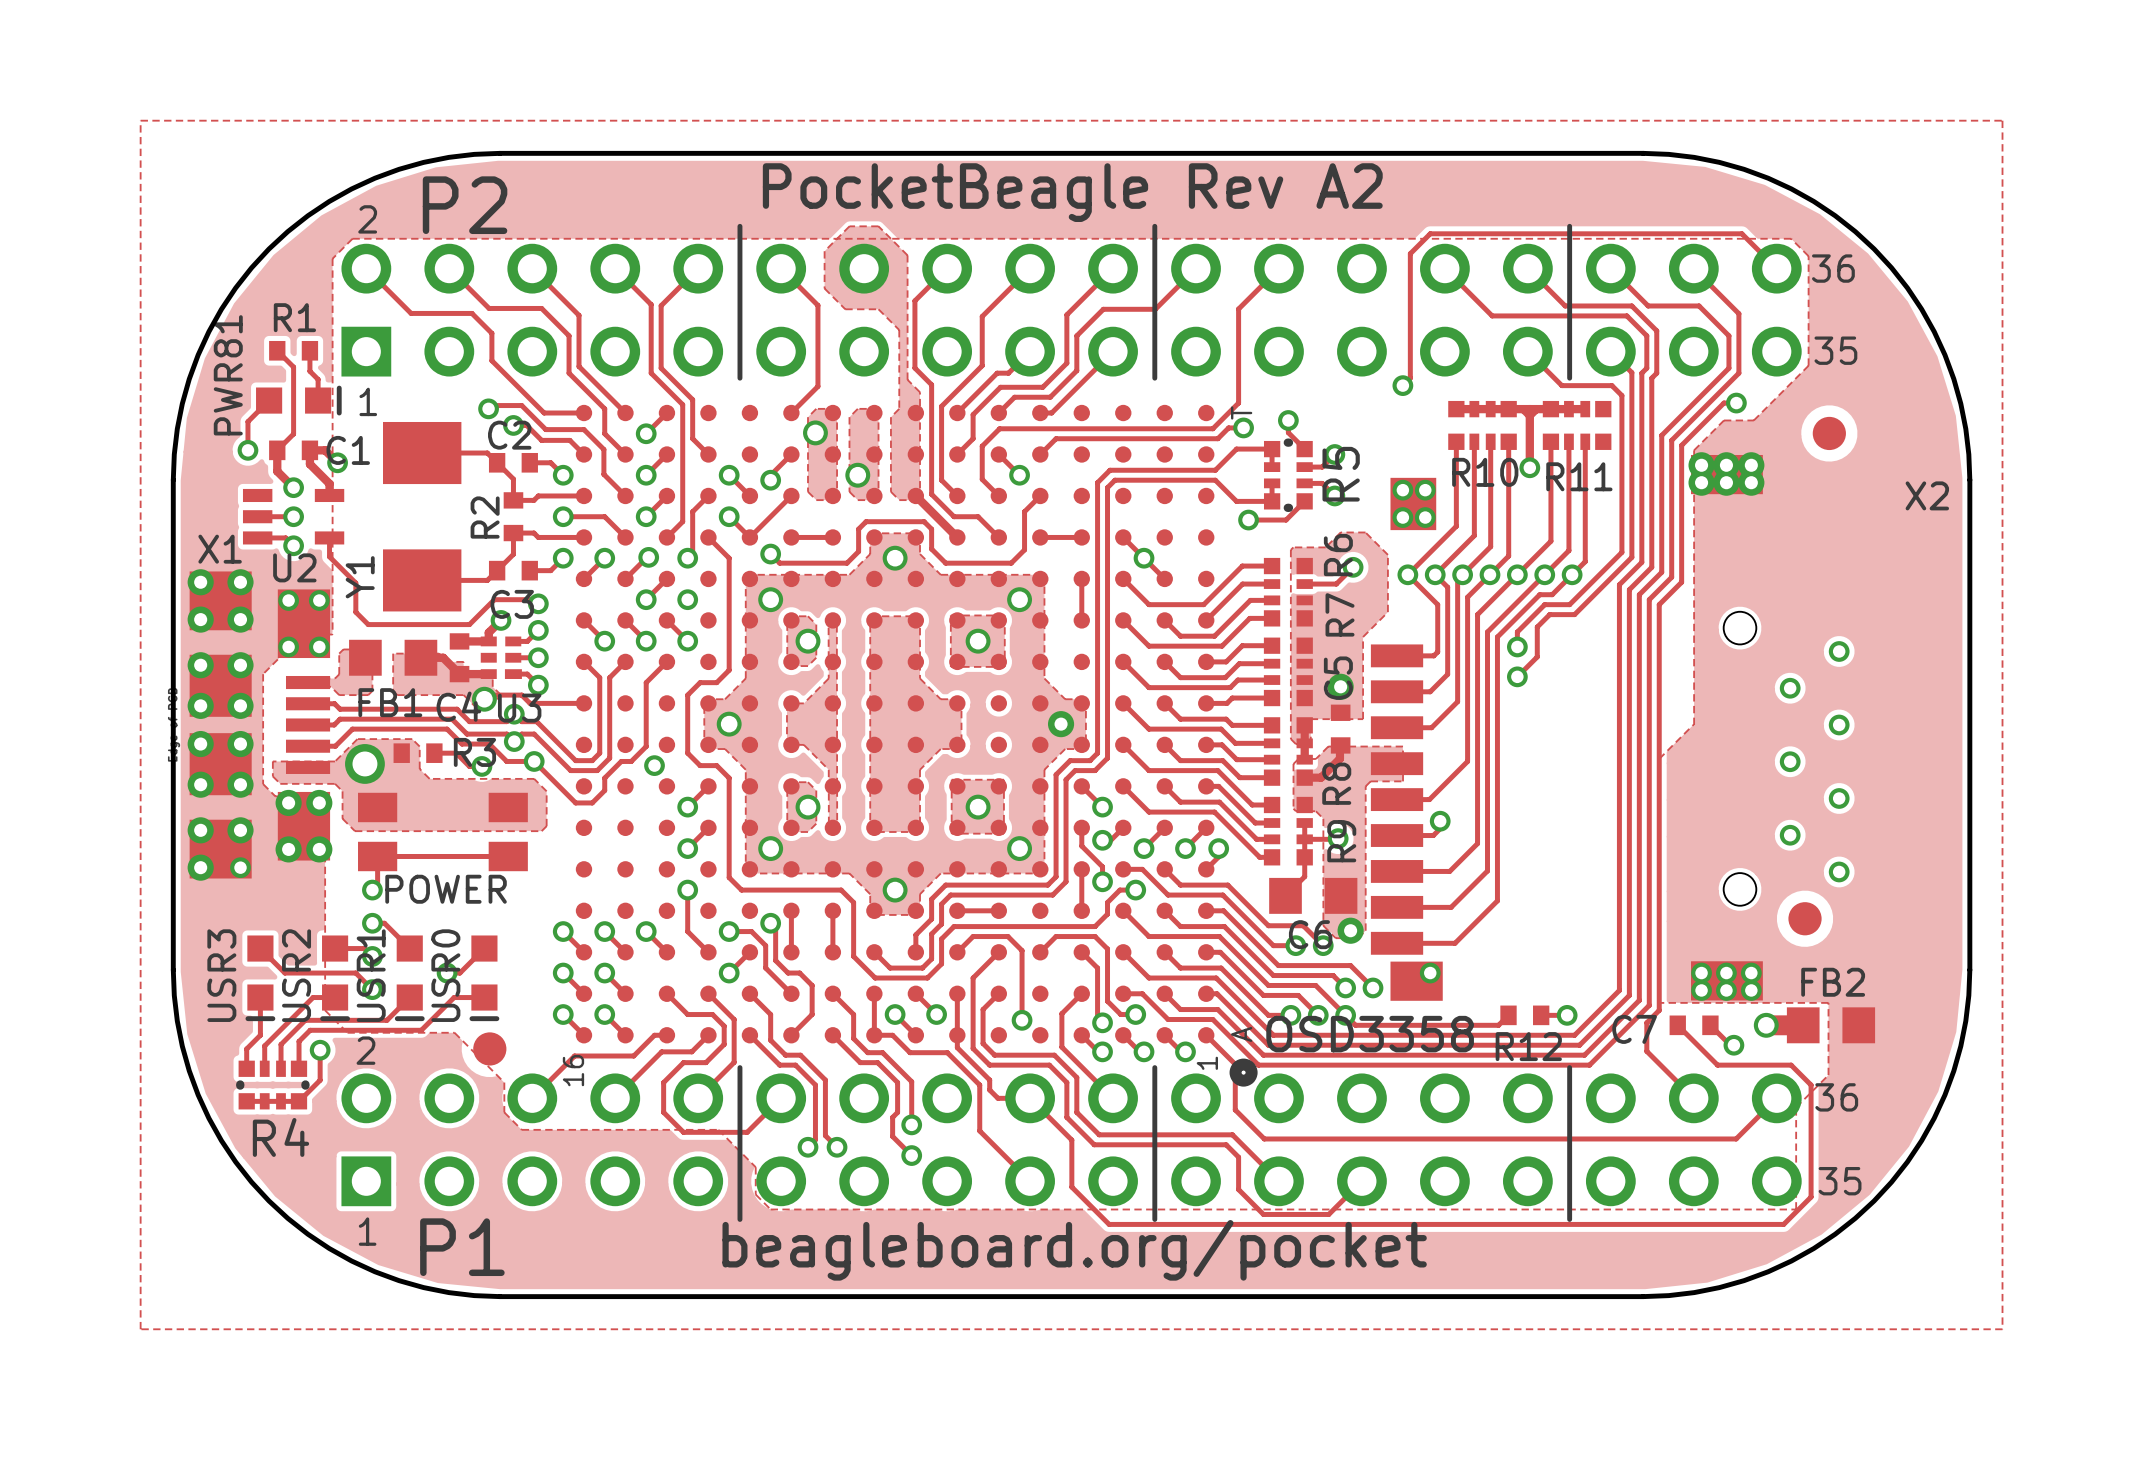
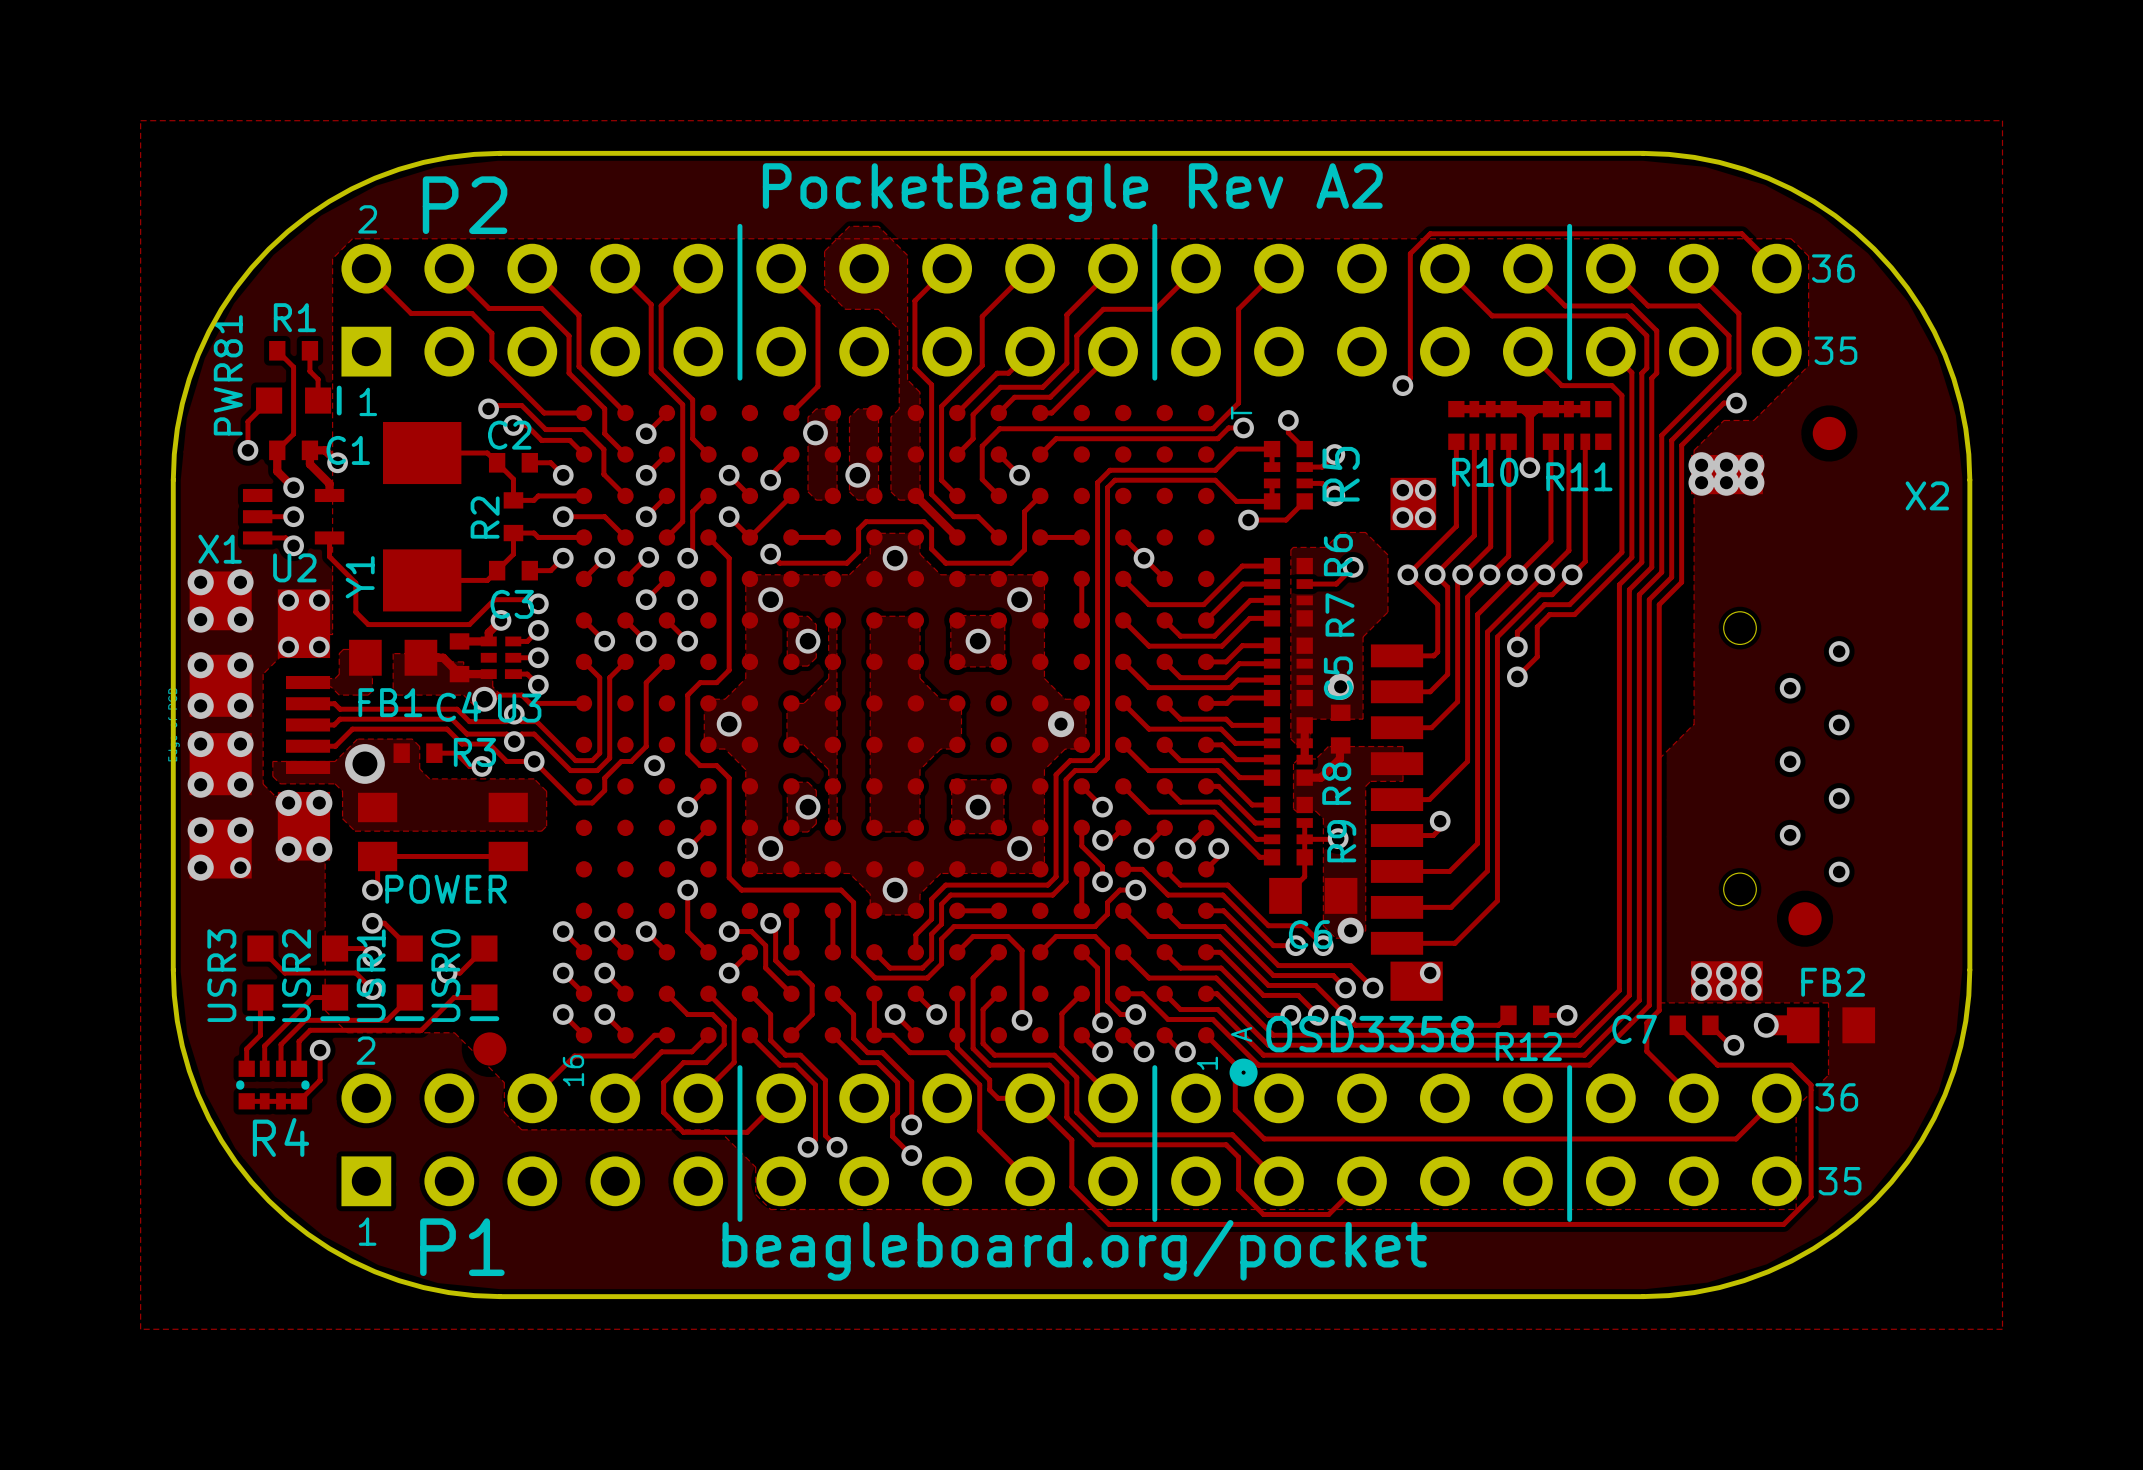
R5 footprint: [1263, 438, 1313, 512] -> [1263, 440, 1313, 510]

